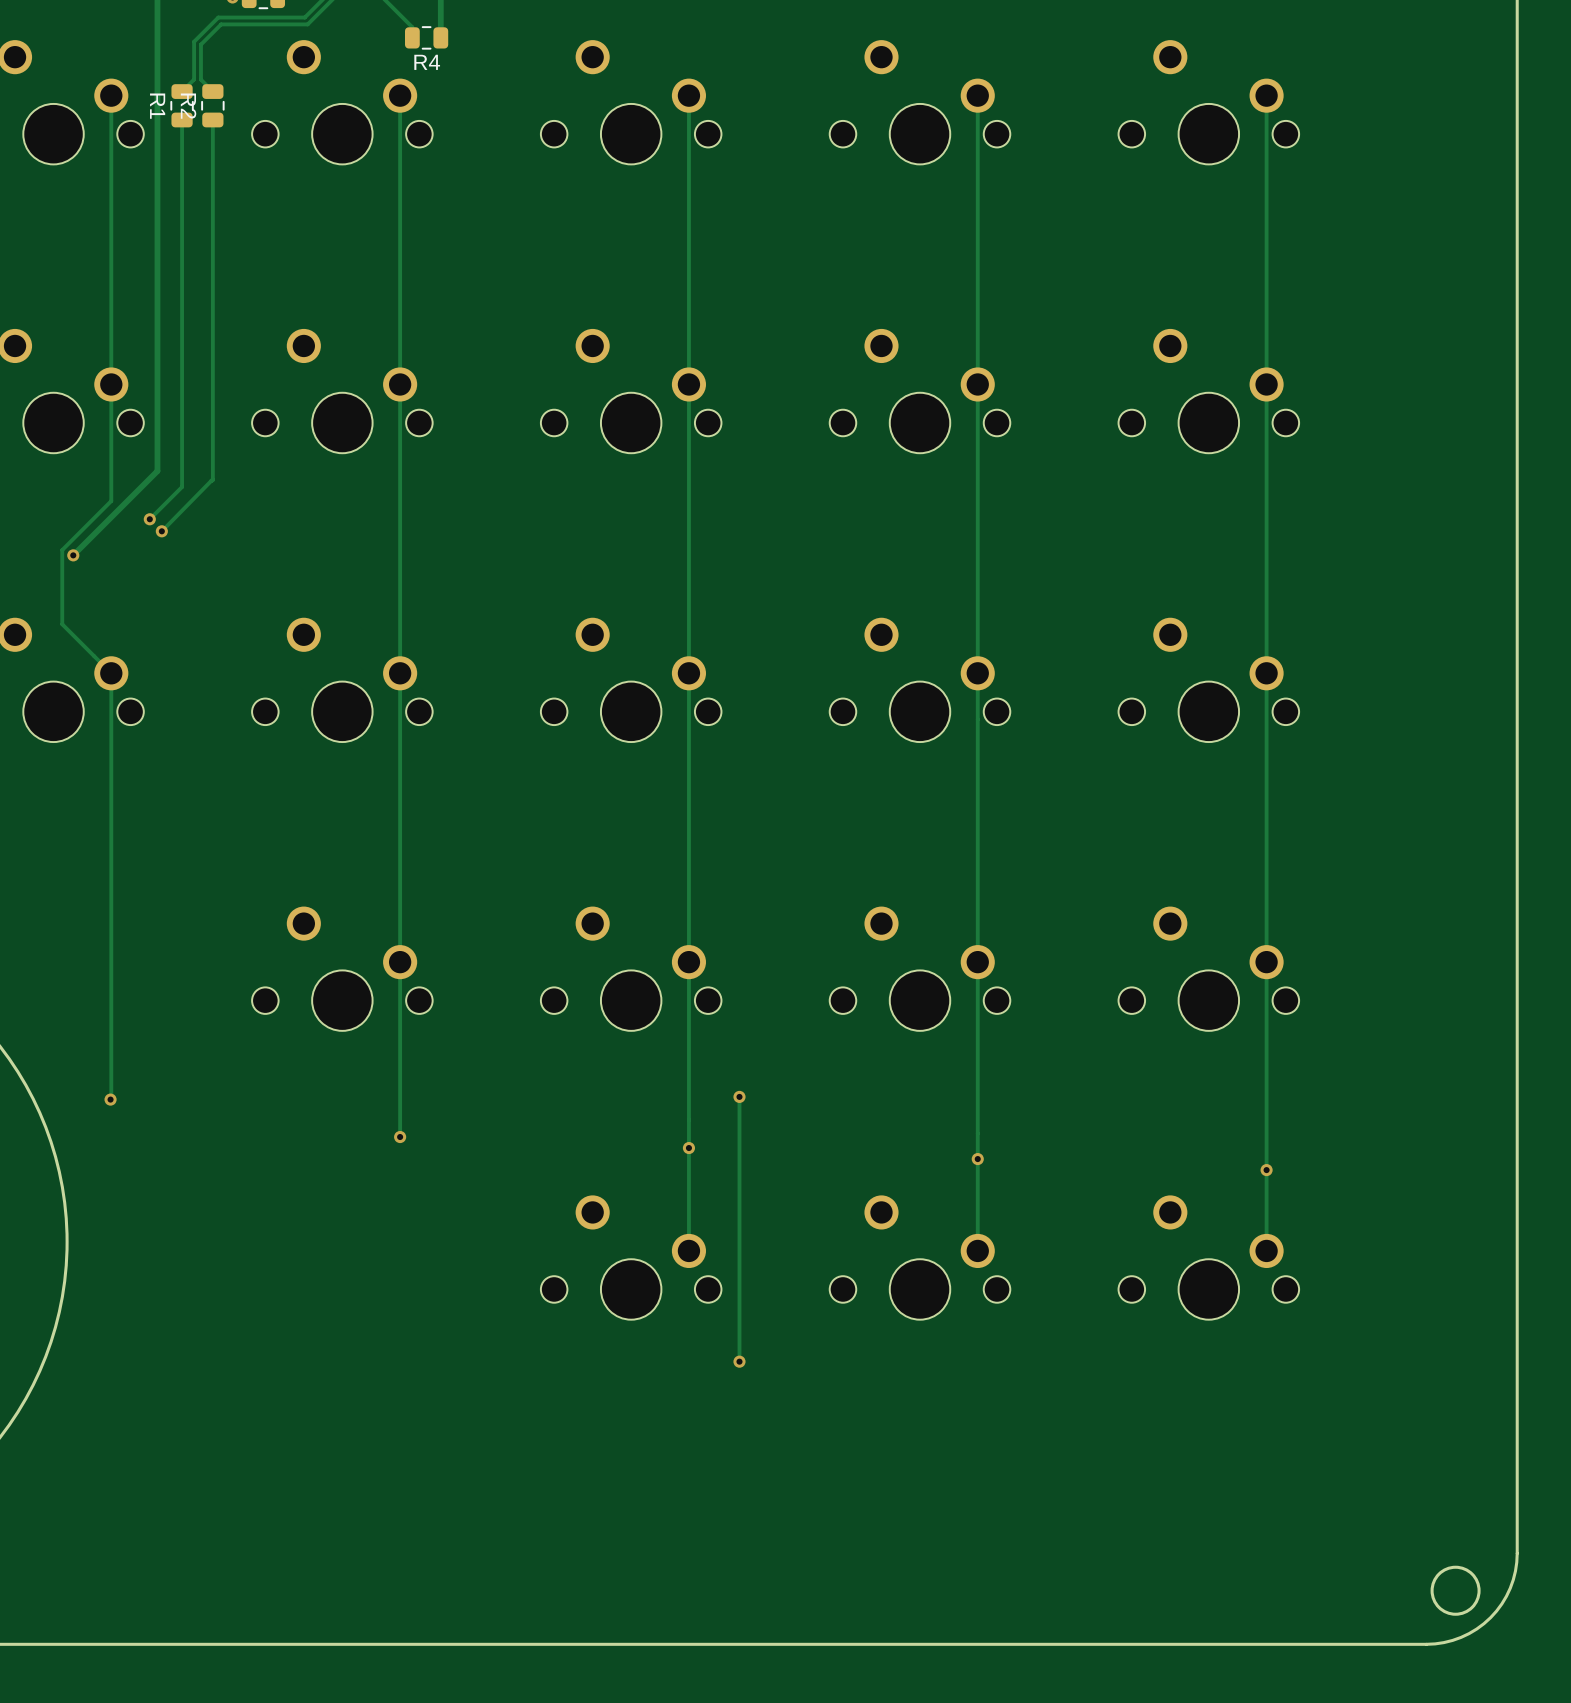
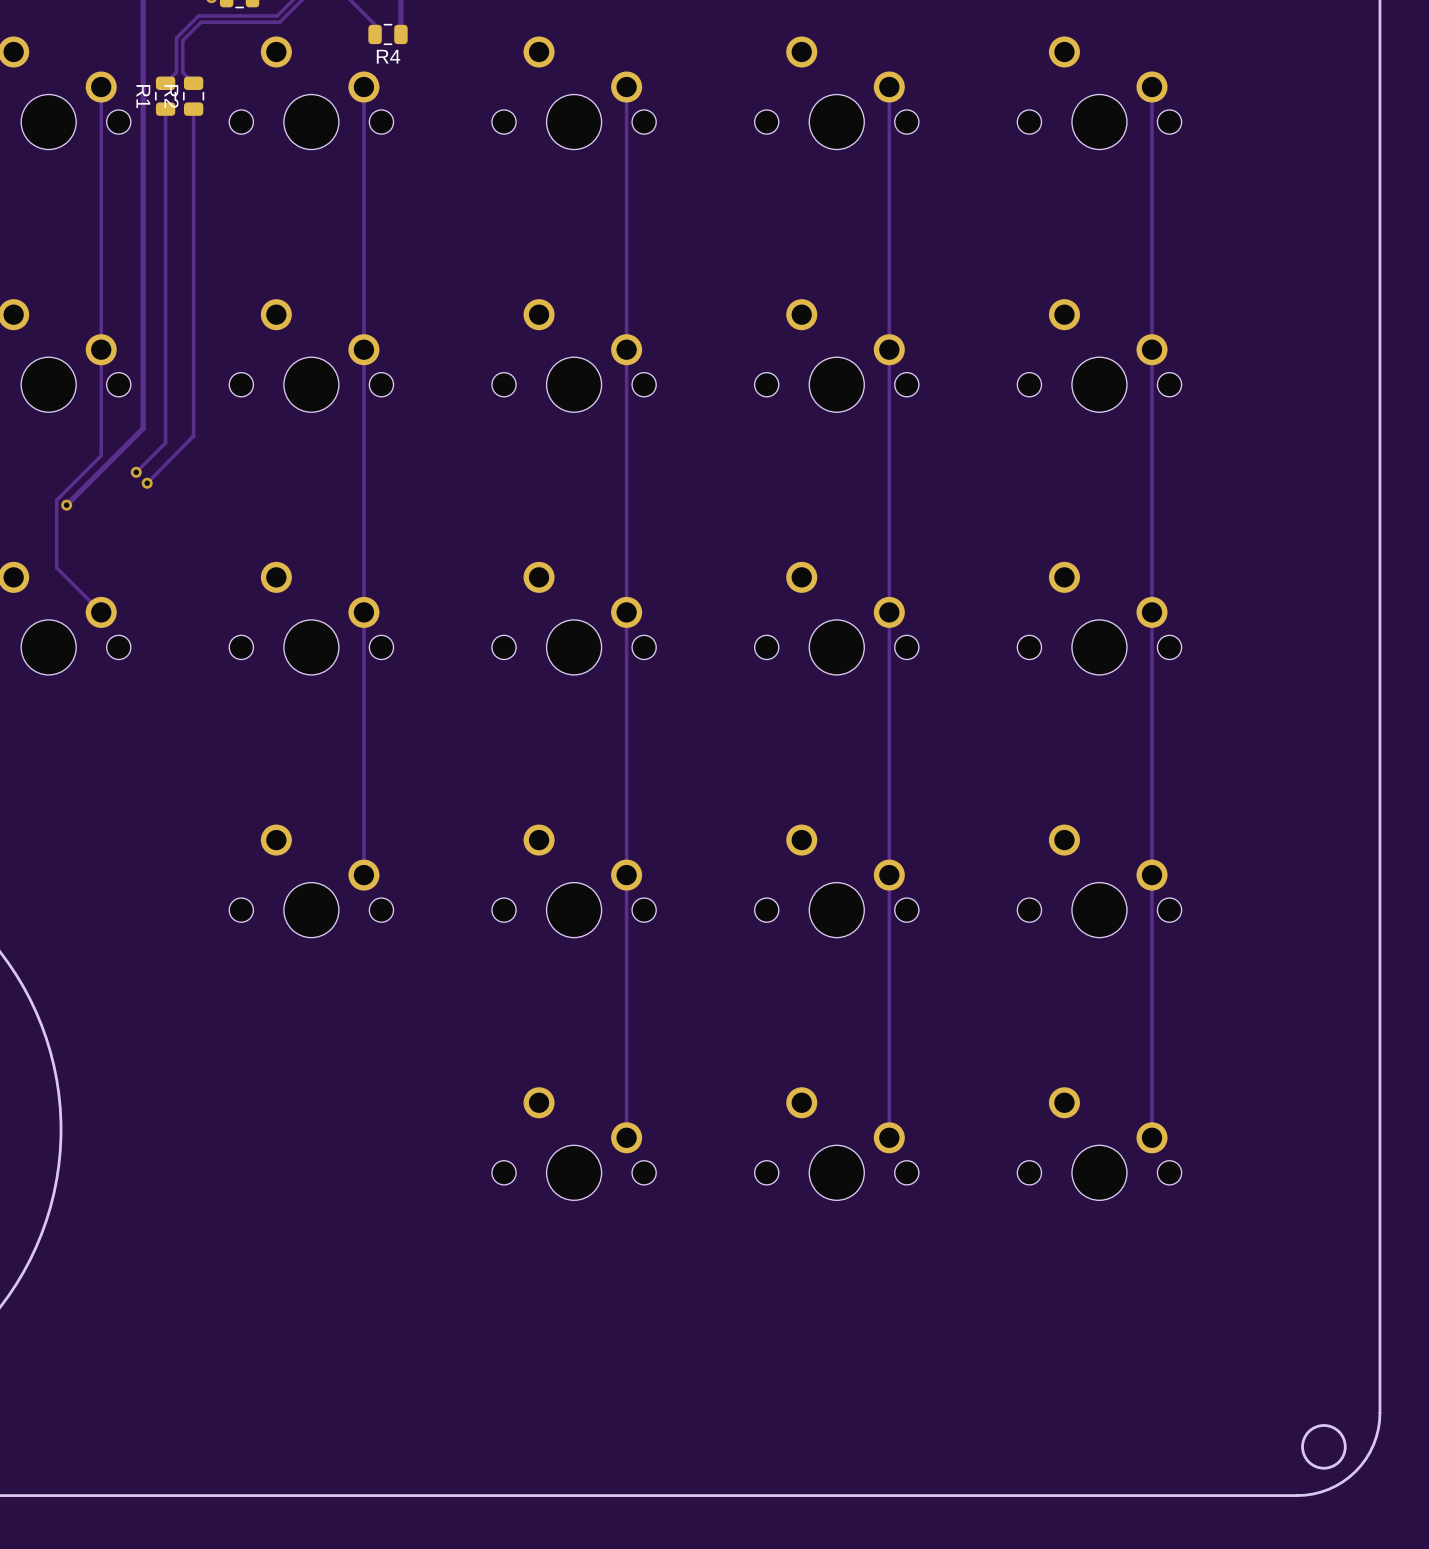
track: (111, 673) (110, 1099) -> none
track: (400, 962) (400, 1137) -> none
track: (739, 1096) (739, 1361) -> none
via: (739, 1096) -> none
via: (110, 1099) -> none
via: (400, 1137) -> none
via: (688, 1148) -> none
via: (977, 1159) -> none
via: (1266, 1170) -> none
via: (739, 1361) -> none

